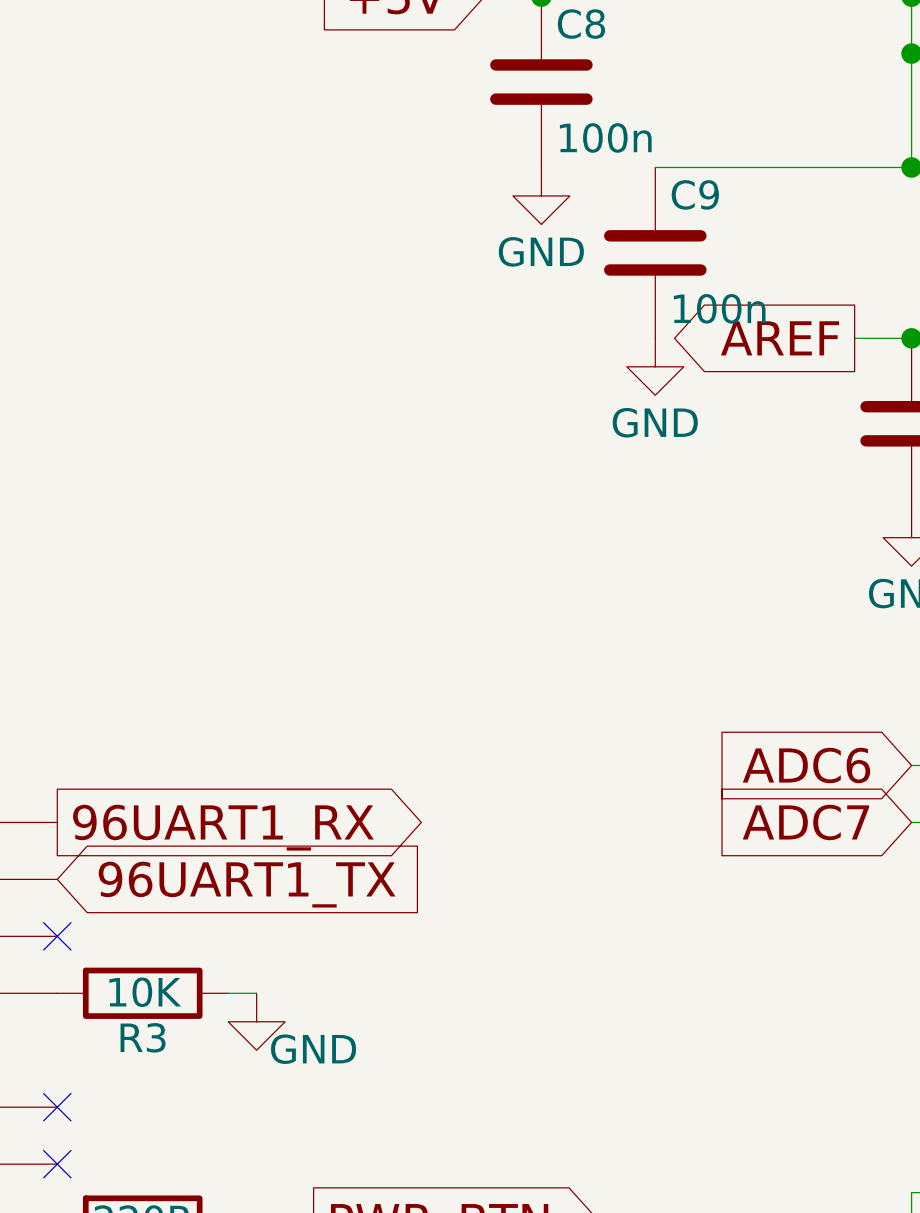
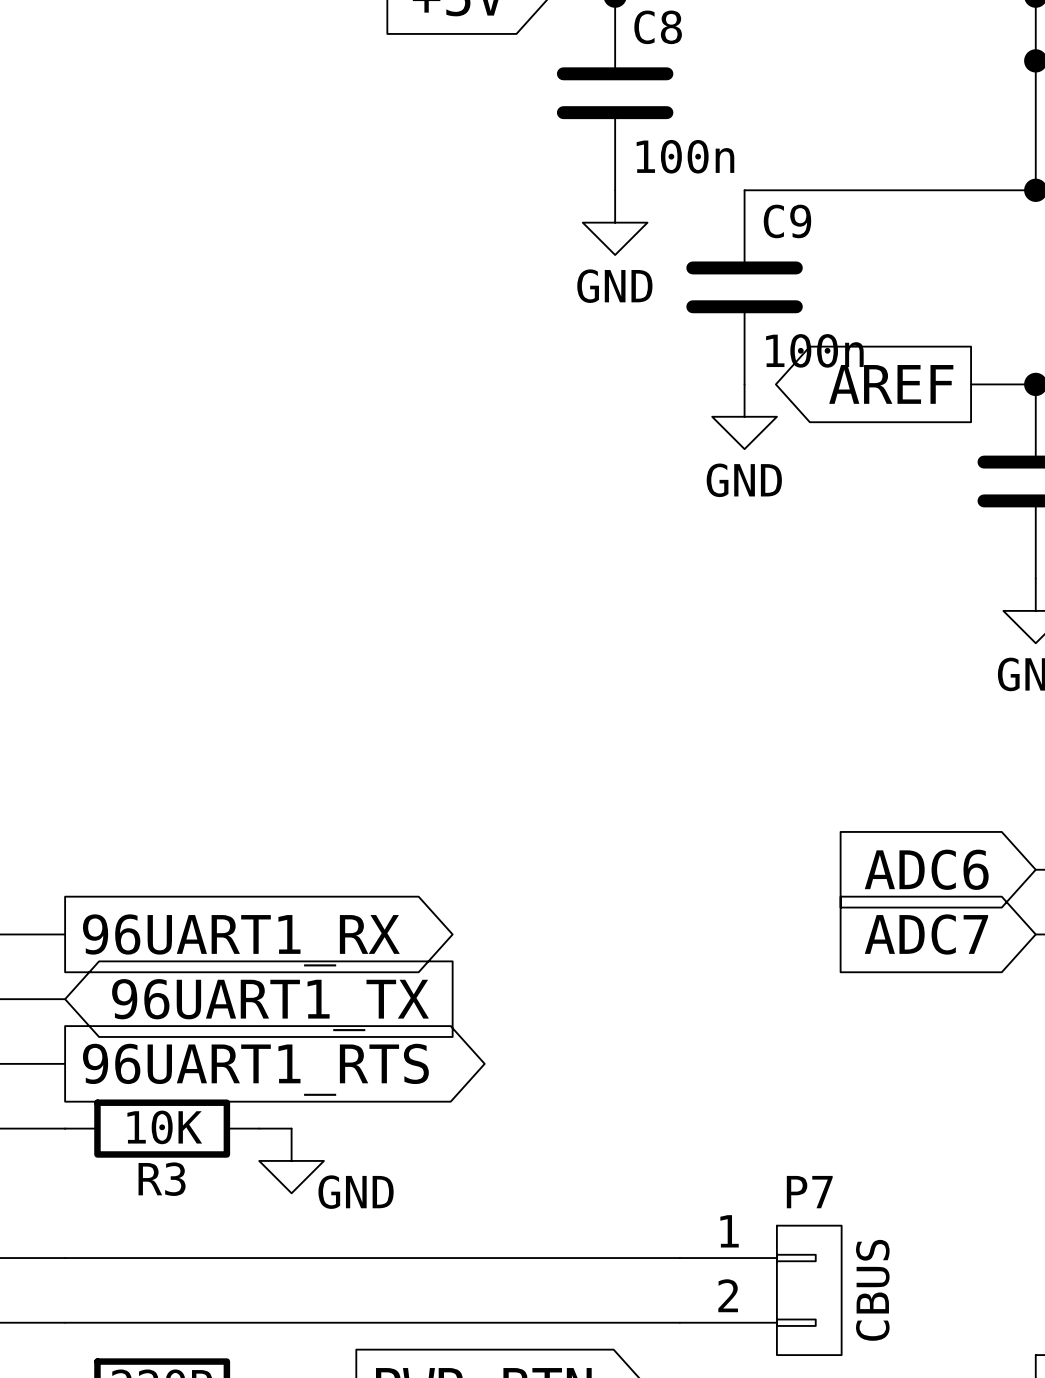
no-connect mark: (57, 936) -> none
global label: none -> 96UART1_RTS (255, 1069)
wire: none -> (65, 1258) (679, 1258)
no-connect mark: (57, 1107) -> none
P7: none -> CBUS (760, 1290)
wire: none -> (65, 1322) (679, 1322)
no-connect mark: (57, 1164) -> none

